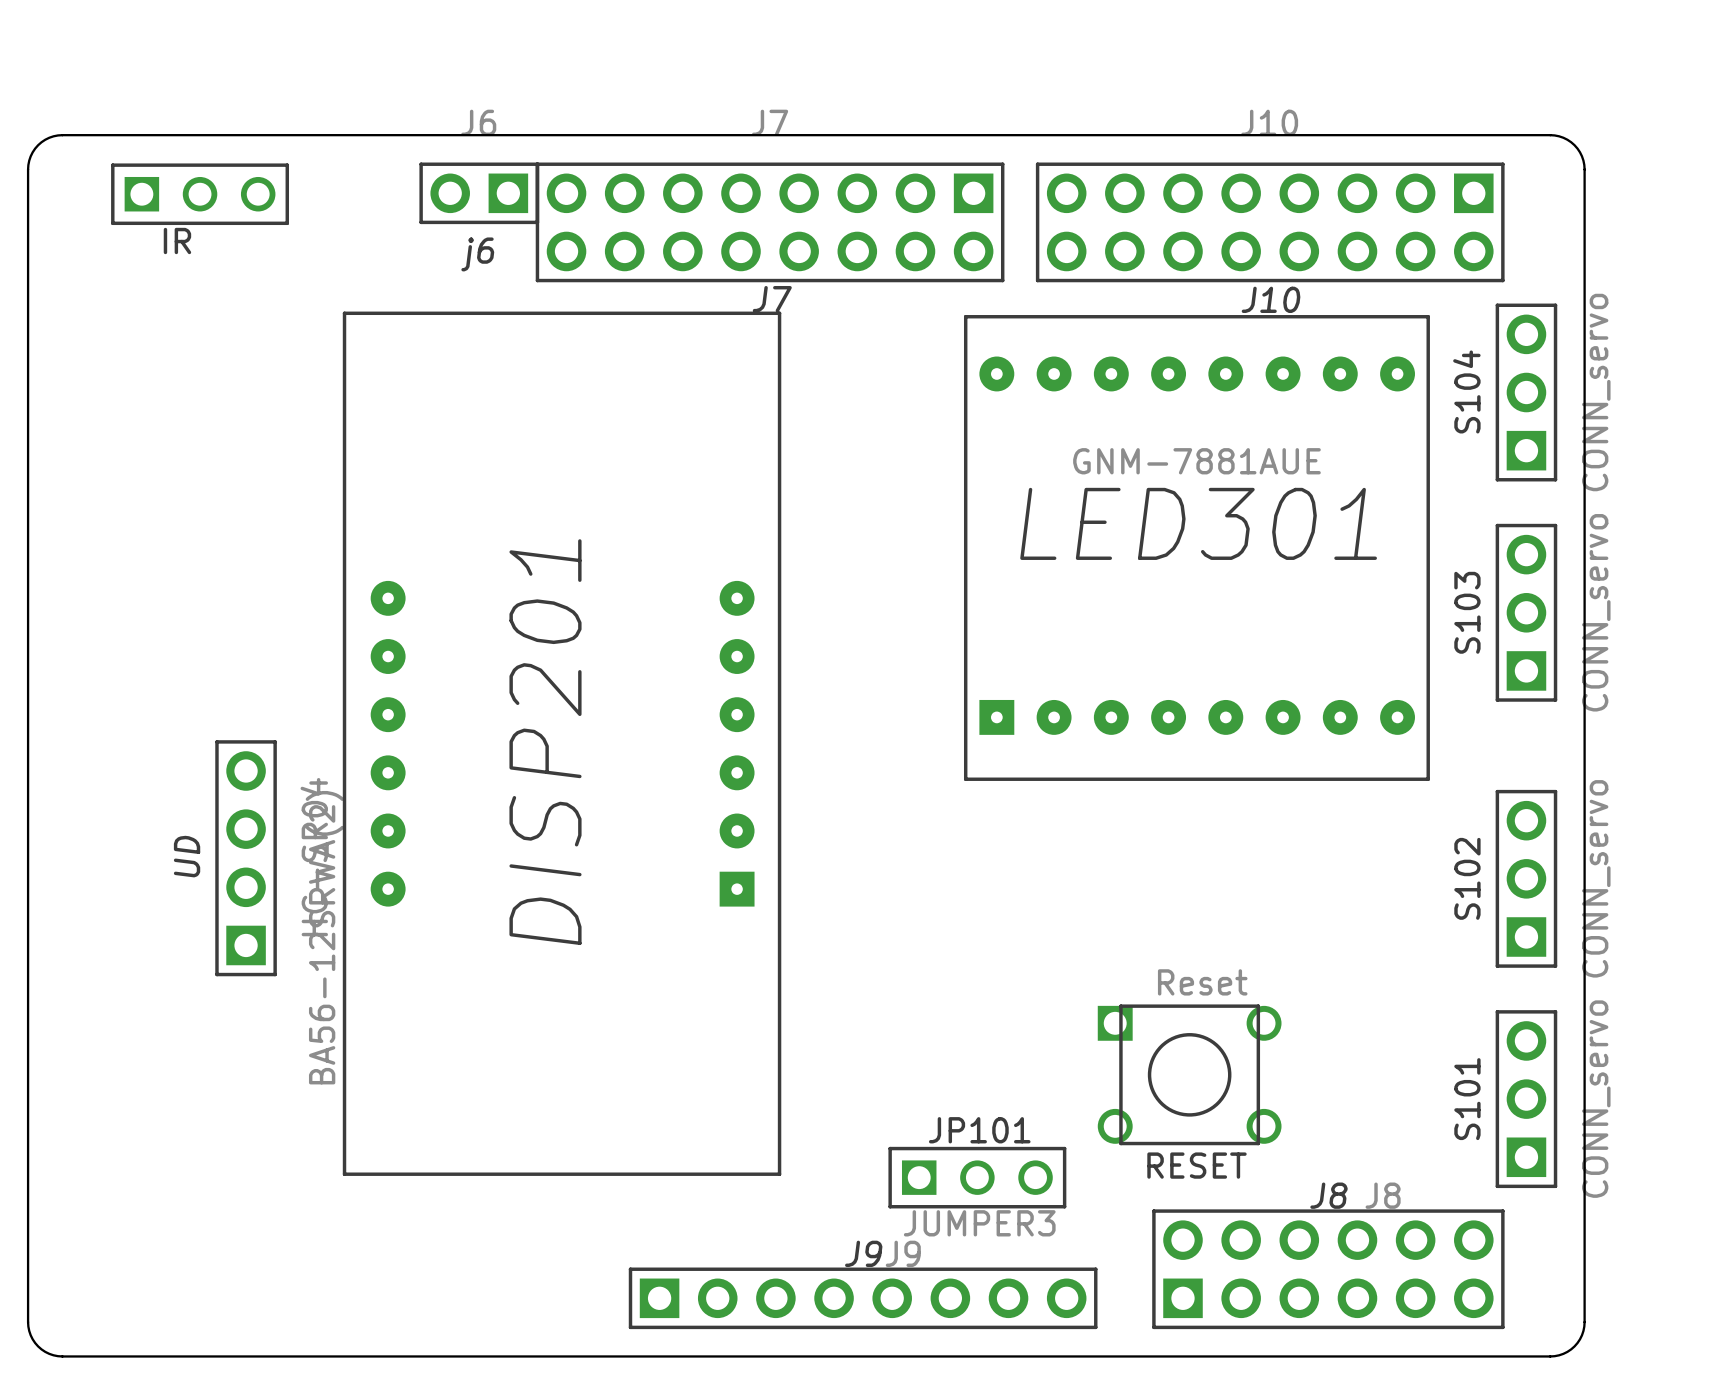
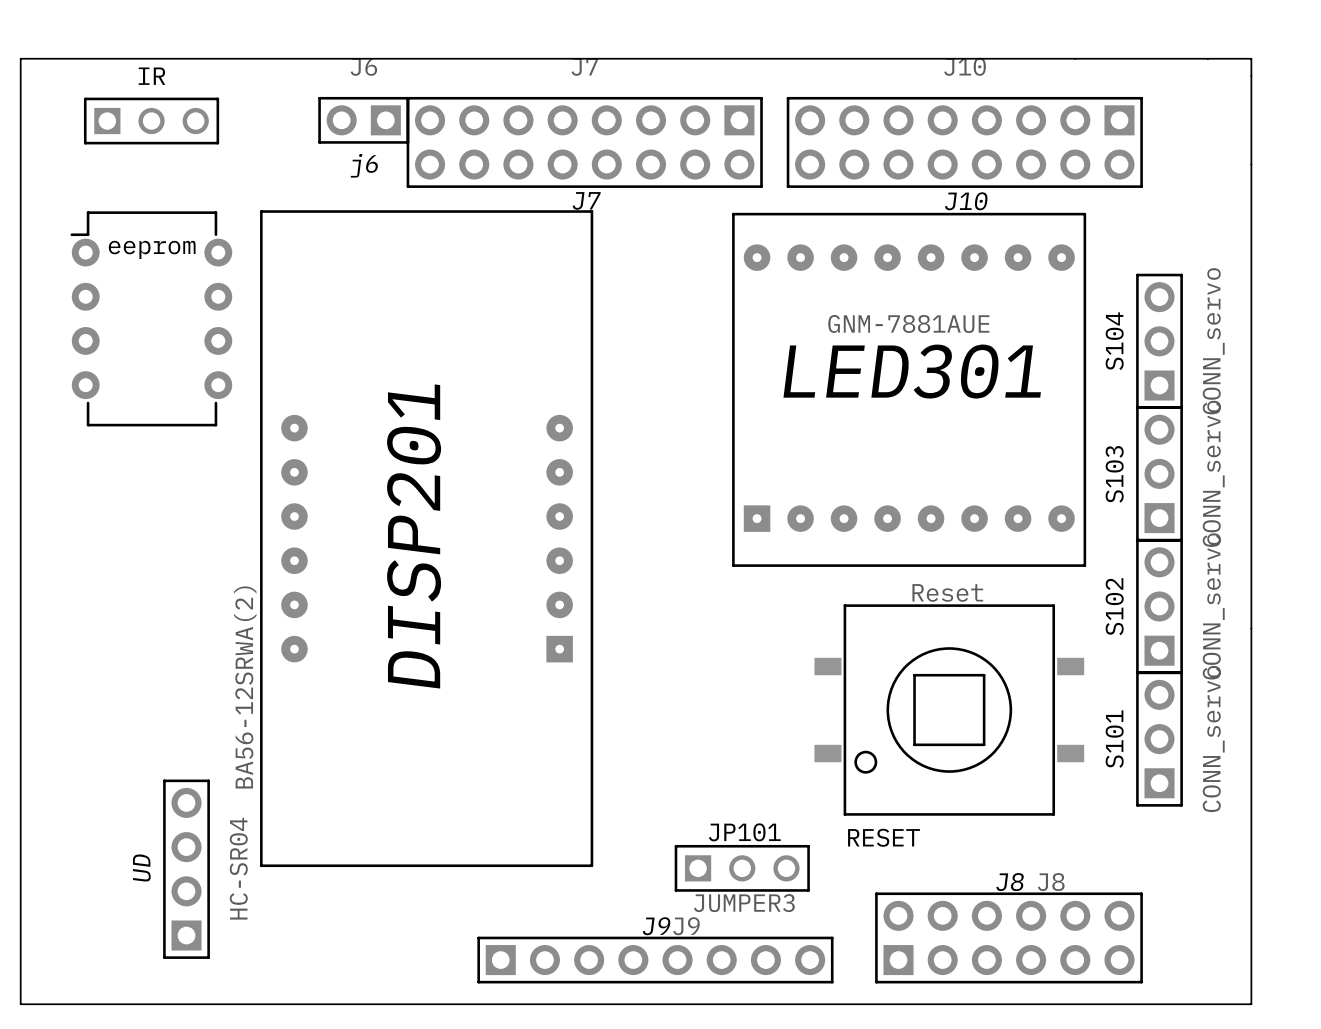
IR name position: IR (177, 240) -> IR (151, 76)
S104 position: (1526, 392) -> (1159, 341)
eeprom: none -> (151, 318)
S103 position: (1526, 612) -> (1159, 473)
UD position: (246, 858) -> (186, 869)
S102 position: (1526, 878) -> (1159, 606)
RESET: none -> Reset (949, 710)
RESET: Reset (1189, 1074) -> none
S101 position: (1526, 1099) -> (1159, 739)
board edge: (62, 1356) (49, 1353) (38, 1346) (30, 1335) (28, 1322) (28, 169) (30, 156) (38, 145) (49, 137) (62, 135) (1550, 135) (1563, 137) (1571, 142) (1581, 156) (1584, 169) (1584, 1322) (1581, 1335) (1574, 1346) (1563, 1353) (1550, 1356) -> (46, 1004) (20, 1004) (20, 58) (1251, 58) (1251, 1004) (1177, 1004)

